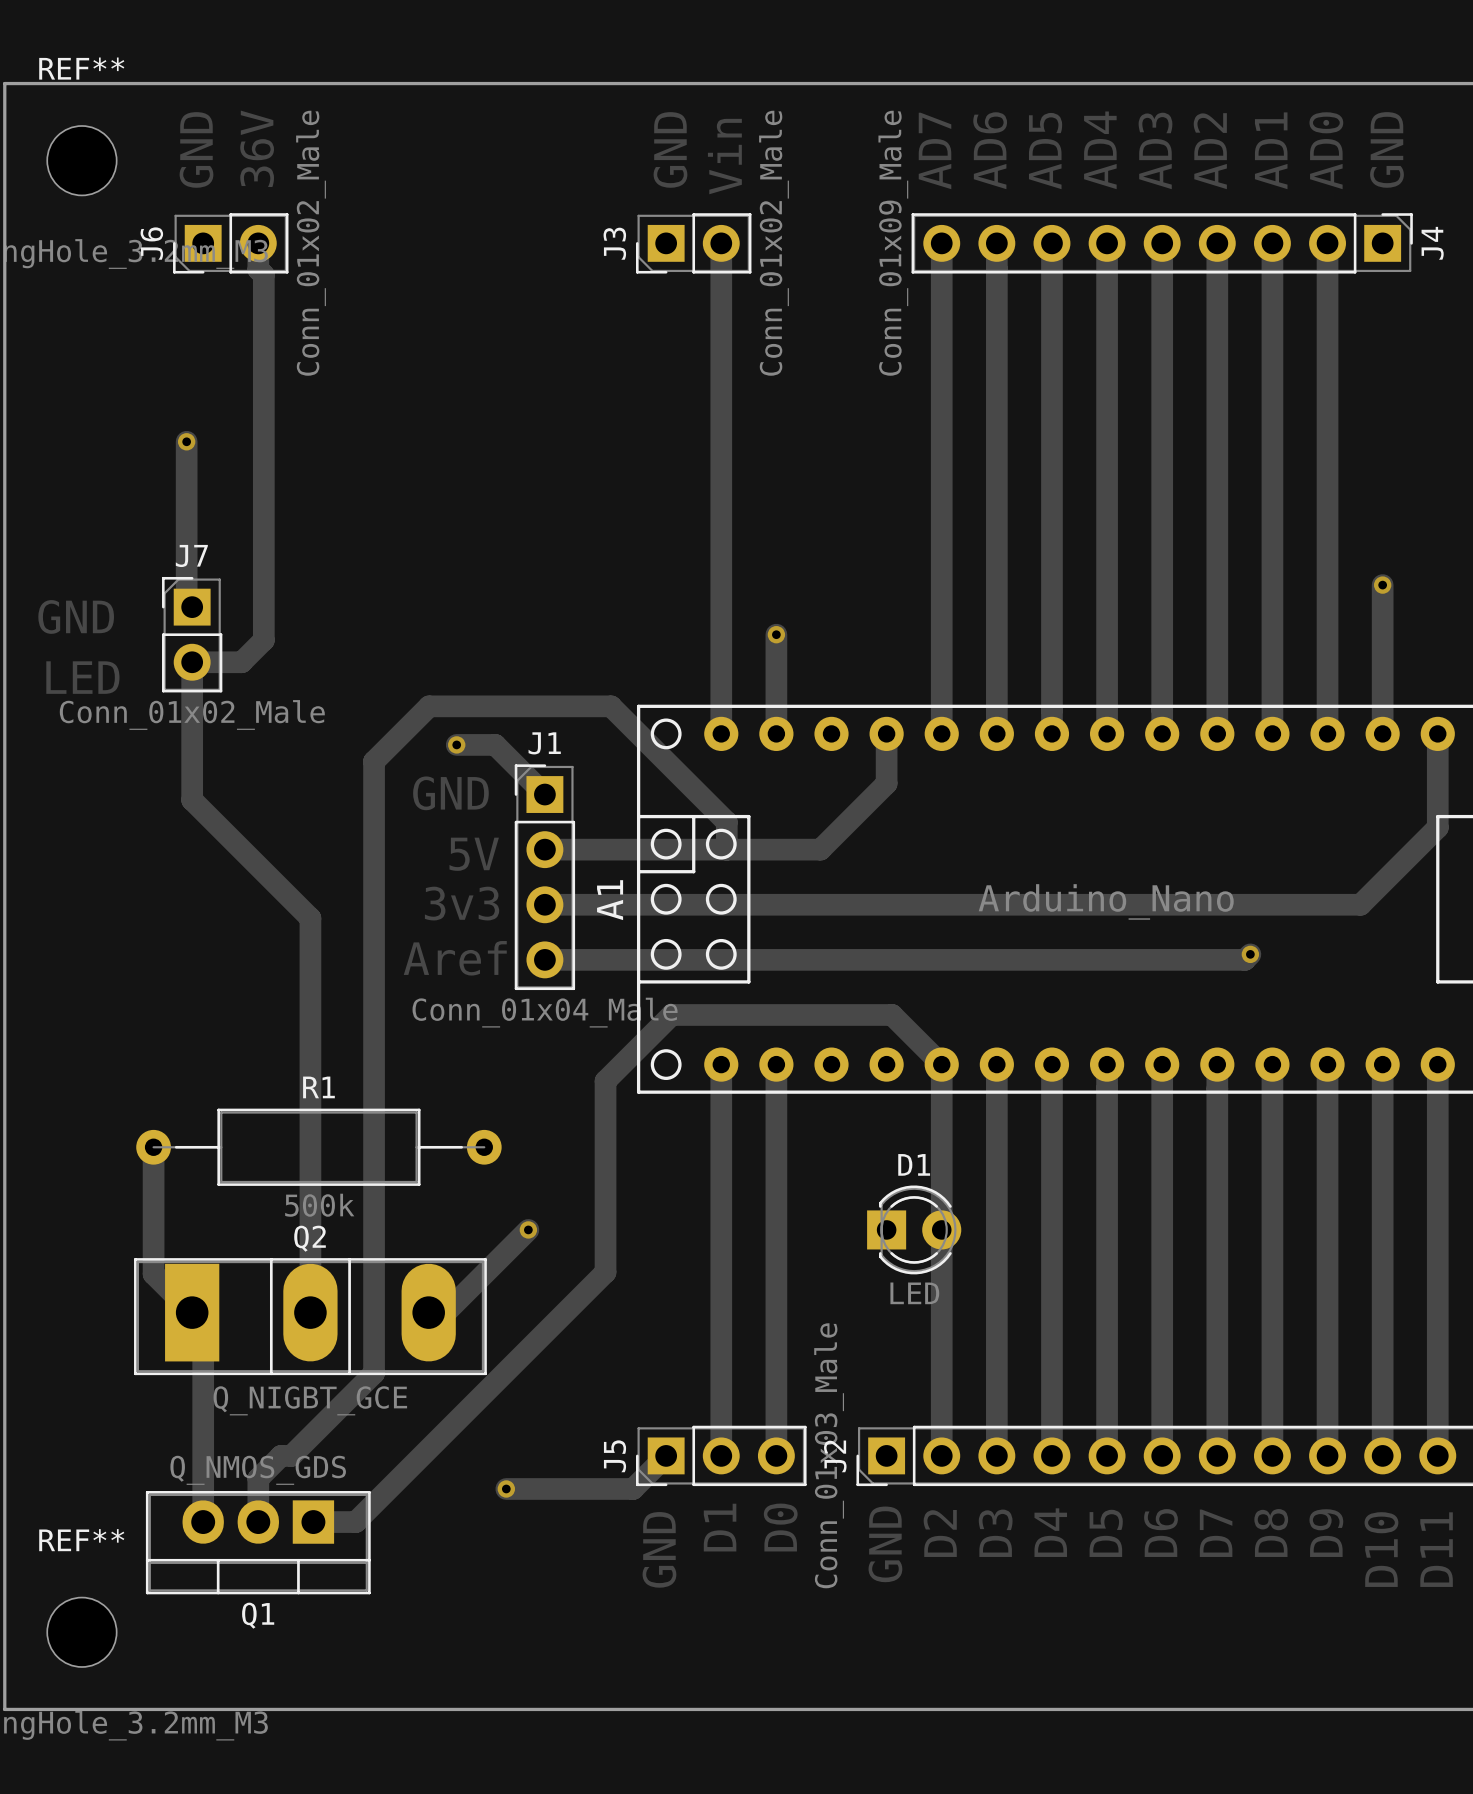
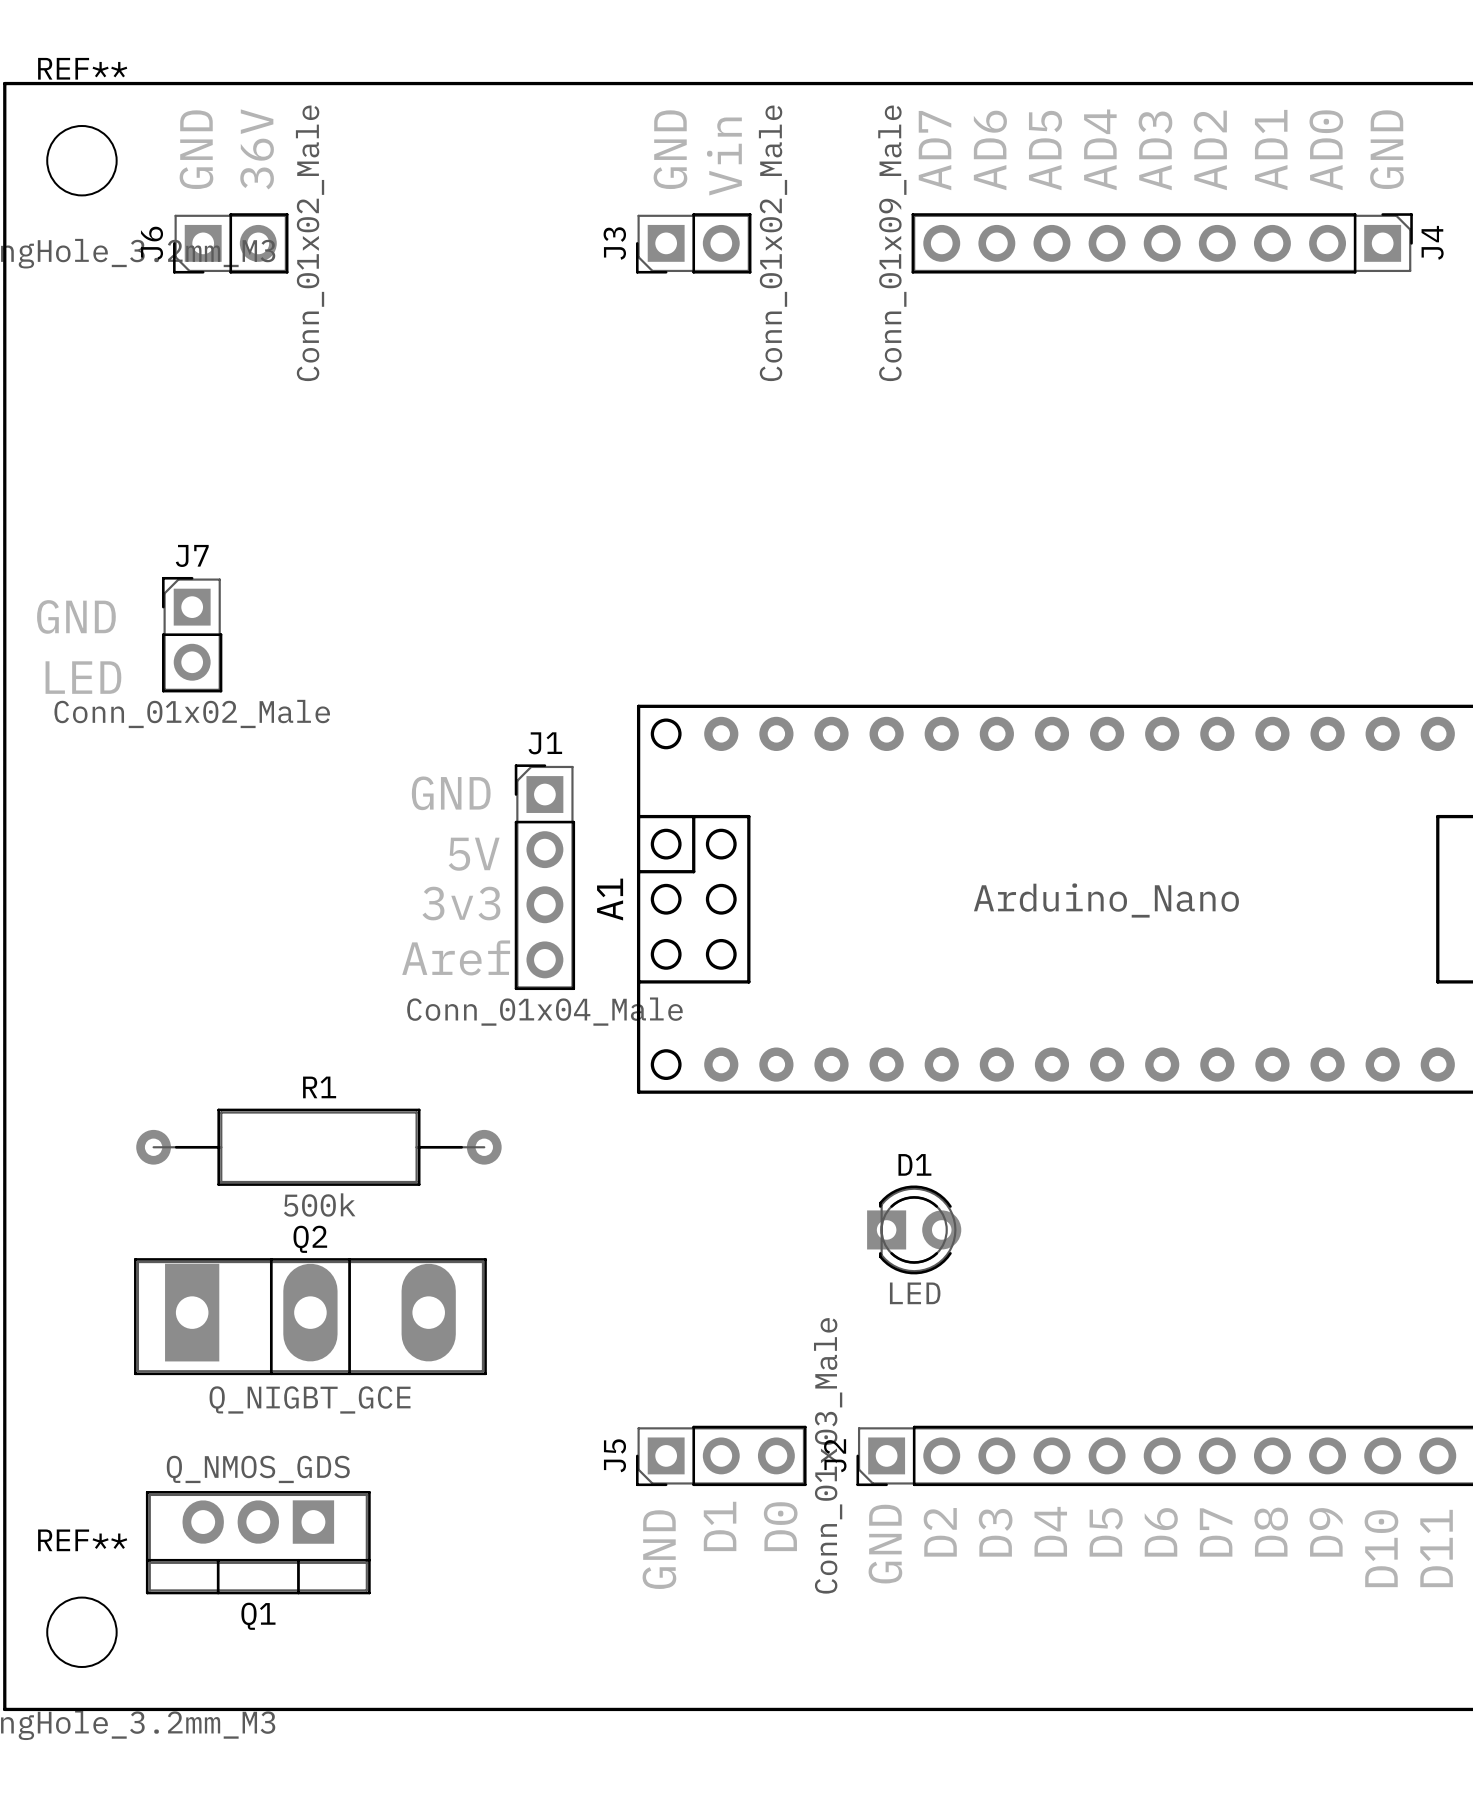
track: (258, 243) (258, 269) (263, 274) (263, 640) (241, 662) (192, 662) (192, 800) (310, 918) (310, 1312) -> none
track: (721, 243) (721, 733) -> none
track: (941, 243) (941, 733) -> none
track: (996, 243) (996, 733) -> none
track: (1051, 243) (1051, 733) -> none
track: (1107, 243) (1107, 733) -> none
track: (1162, 243) (1162, 733) -> none
track: (1217, 243) (1217, 733) -> none
track: (1272, 243) (1272, 733) -> none
track: (1327, 243) (1327, 733) -> none
track: (186, 441) (186, 601) (192, 607) -> none
via: (186, 441) -> none
track: (1382, 585) (1382, 733) -> none
via: (1382, 585) -> none
track: (776, 634) (776, 733) -> none
via: (776, 634) -> none
track: (886, 733) (886, 783) (820, 849) (544, 849) -> none
track: (1437, 733) (1437, 827) (1360, 904) (544, 904) -> none
track: (456, 744) (495, 744) (544, 794) -> none
via: (456, 744) -> none
track: (726, 849) (726, 822) (611, 706) (429, 706) (374, 761) (374, 1373) (291, 1455) (281, 1455) (258, 1478) (258, 1522) -> none
track: (1250, 954) (1244, 959) (544, 959) -> none
via: (1250, 954) -> none
track: (721, 1064) (721, 1455) -> none
track: (776, 1064) (776, 1455) -> none
track: (996, 1064) (996, 1455) -> none
track: (1051, 1064) (1051, 1455) -> none
track: (1107, 1064) (1107, 1455) -> none
track: (1162, 1064) (1162, 1455) -> none
track: (1217, 1064) (1217, 1455) -> none
track: (1272, 1064) (1272, 1455) -> none
track: (1327, 1064) (1327, 1455) -> none
track: (1382, 1064) (1382, 1455) -> none
track: (1437, 1064) (1437, 1455) -> none
track: (153, 1147) (153, 1274) (203, 1323) (203, 1522) -> none
track: (528, 1229) (445, 1312) (428, 1312) -> none
via: (528, 1229) -> none
track: (666, 1455) (633, 1488) (506, 1488) -> none
track: (941, 1455) (941, 1064) (892, 1014) (671, 1014) (605, 1081) (605, 1272) (355, 1522) (313, 1522) -> none
via: (506, 1488) -> none

